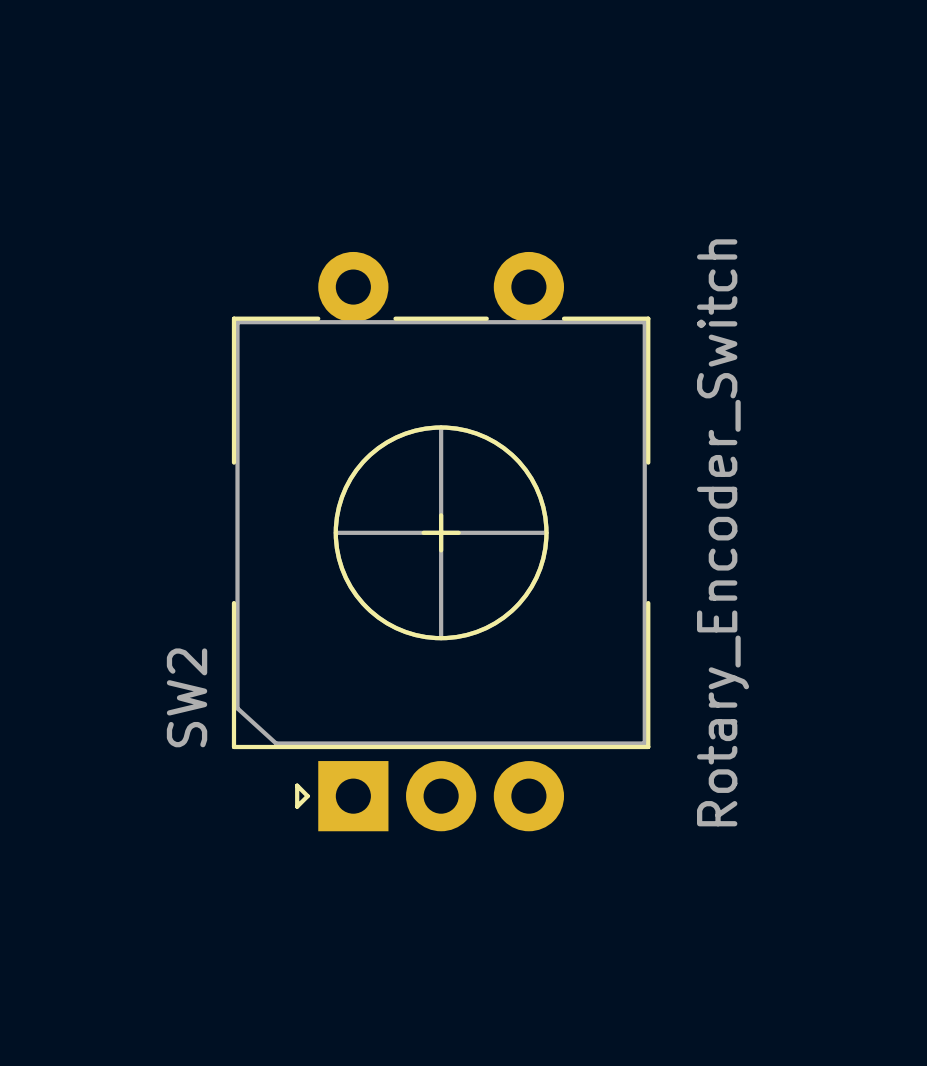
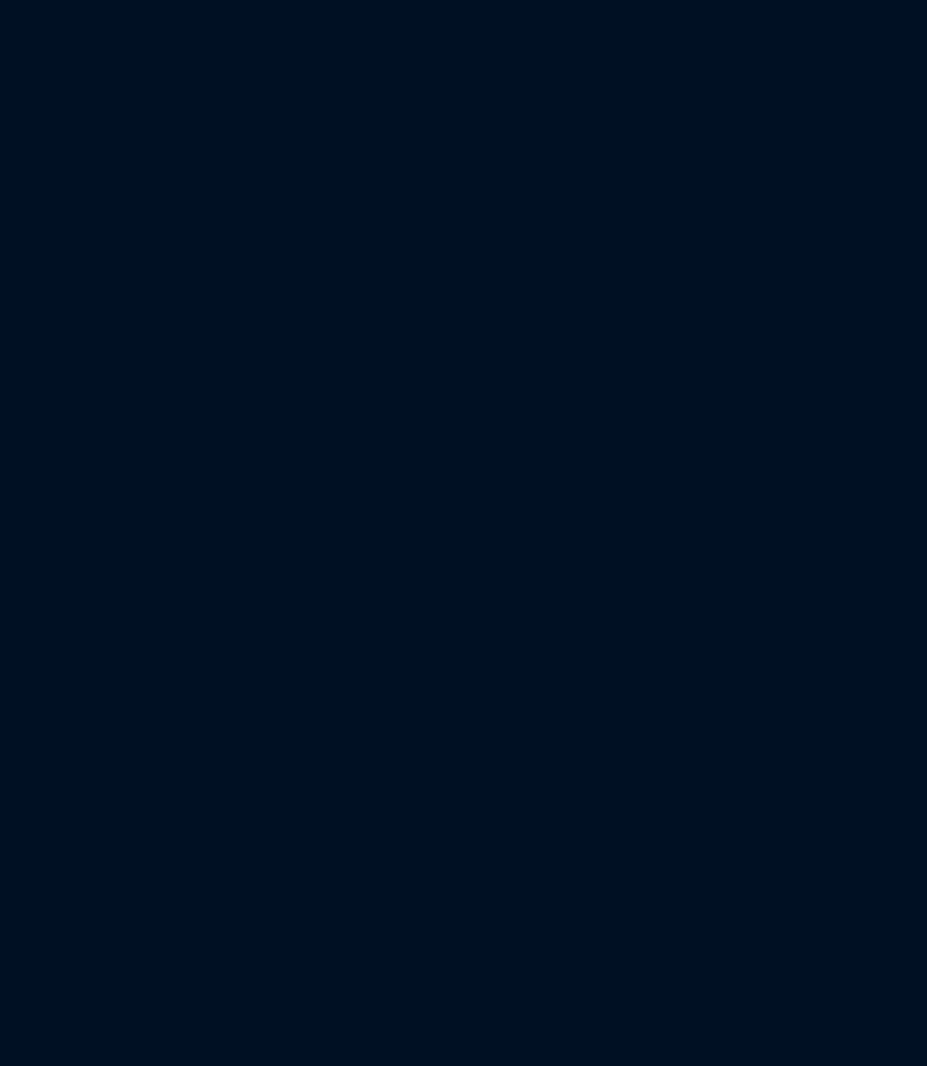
SW2: Rotary_Encoder_Switch (441, 541) -> none

